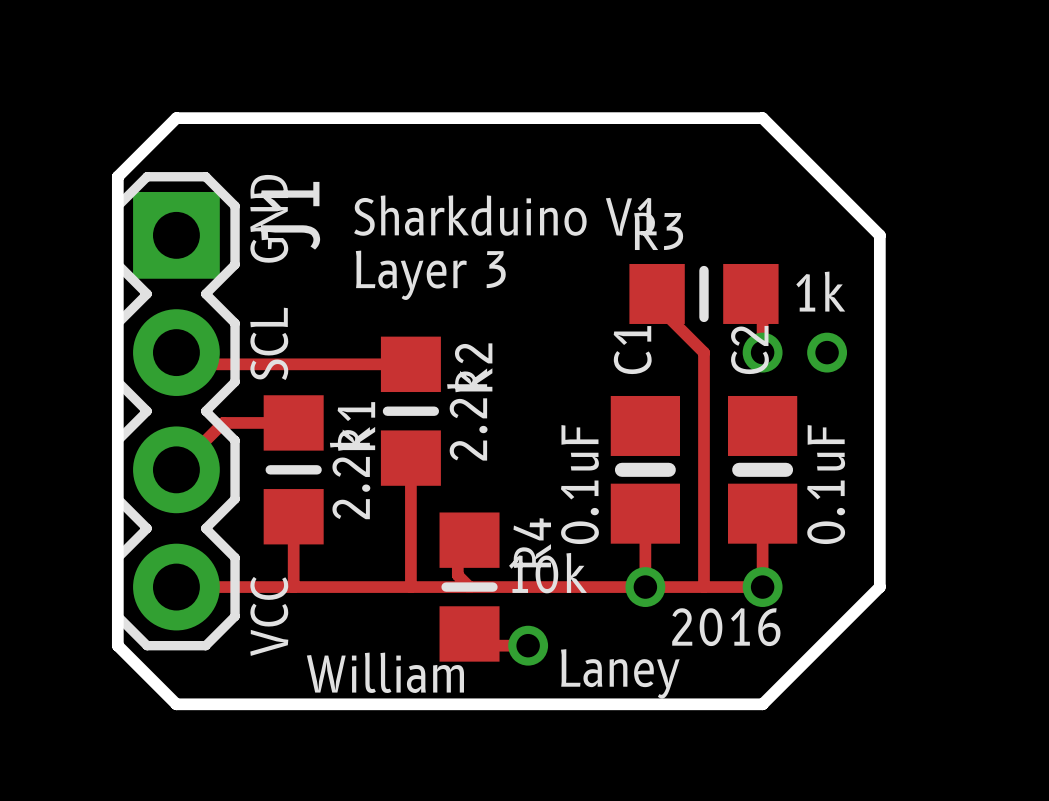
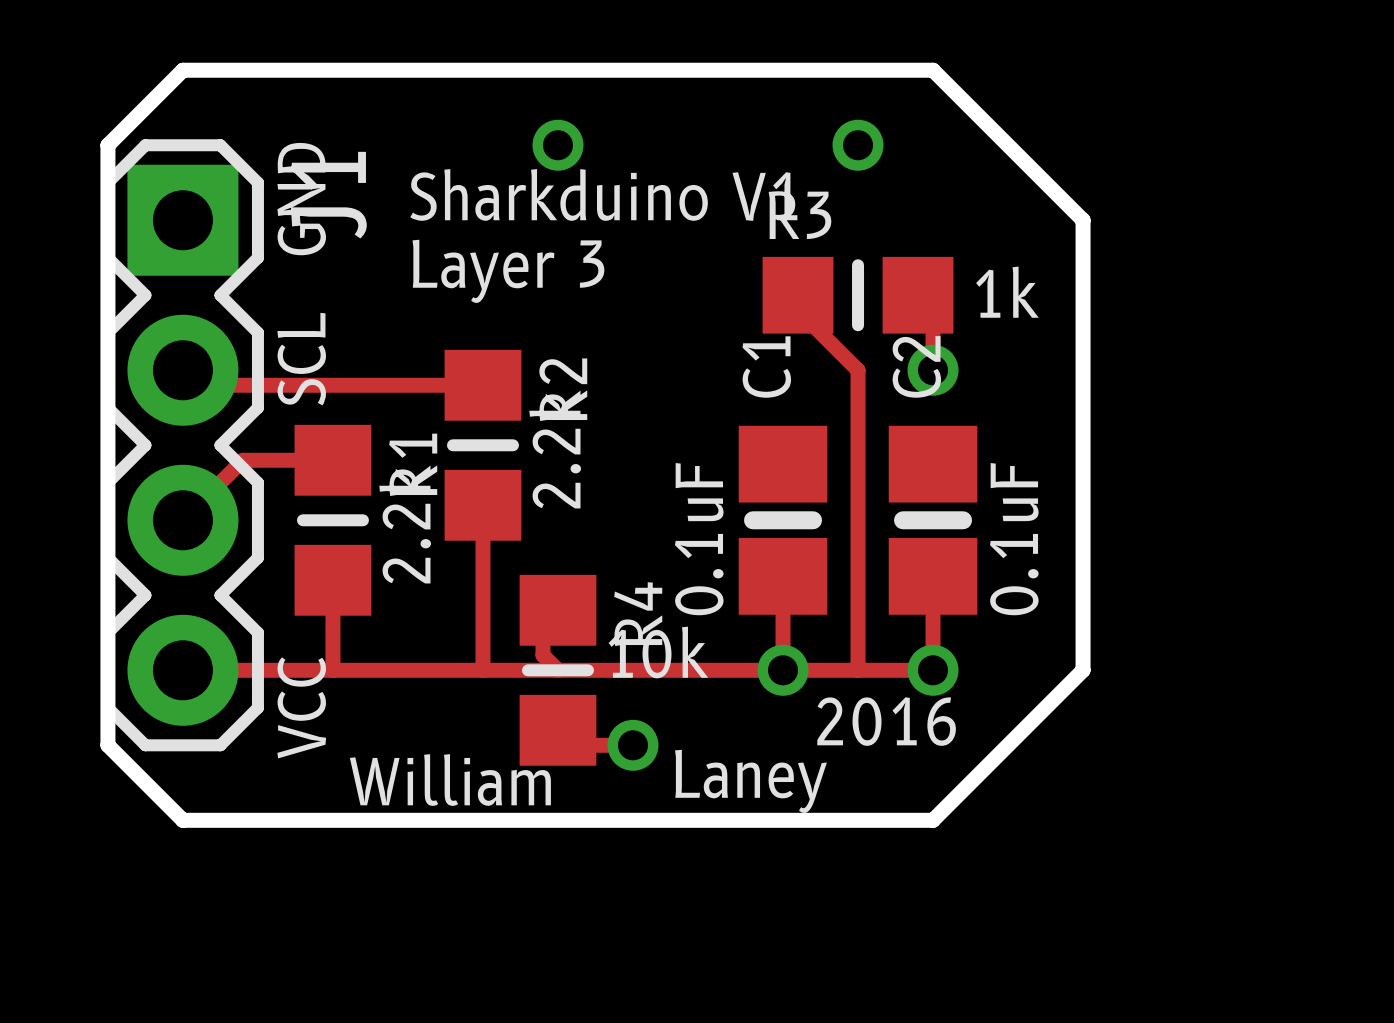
via: none -> (557, 145)
via: none -> (858, 145)
via: (827, 352) -> none

